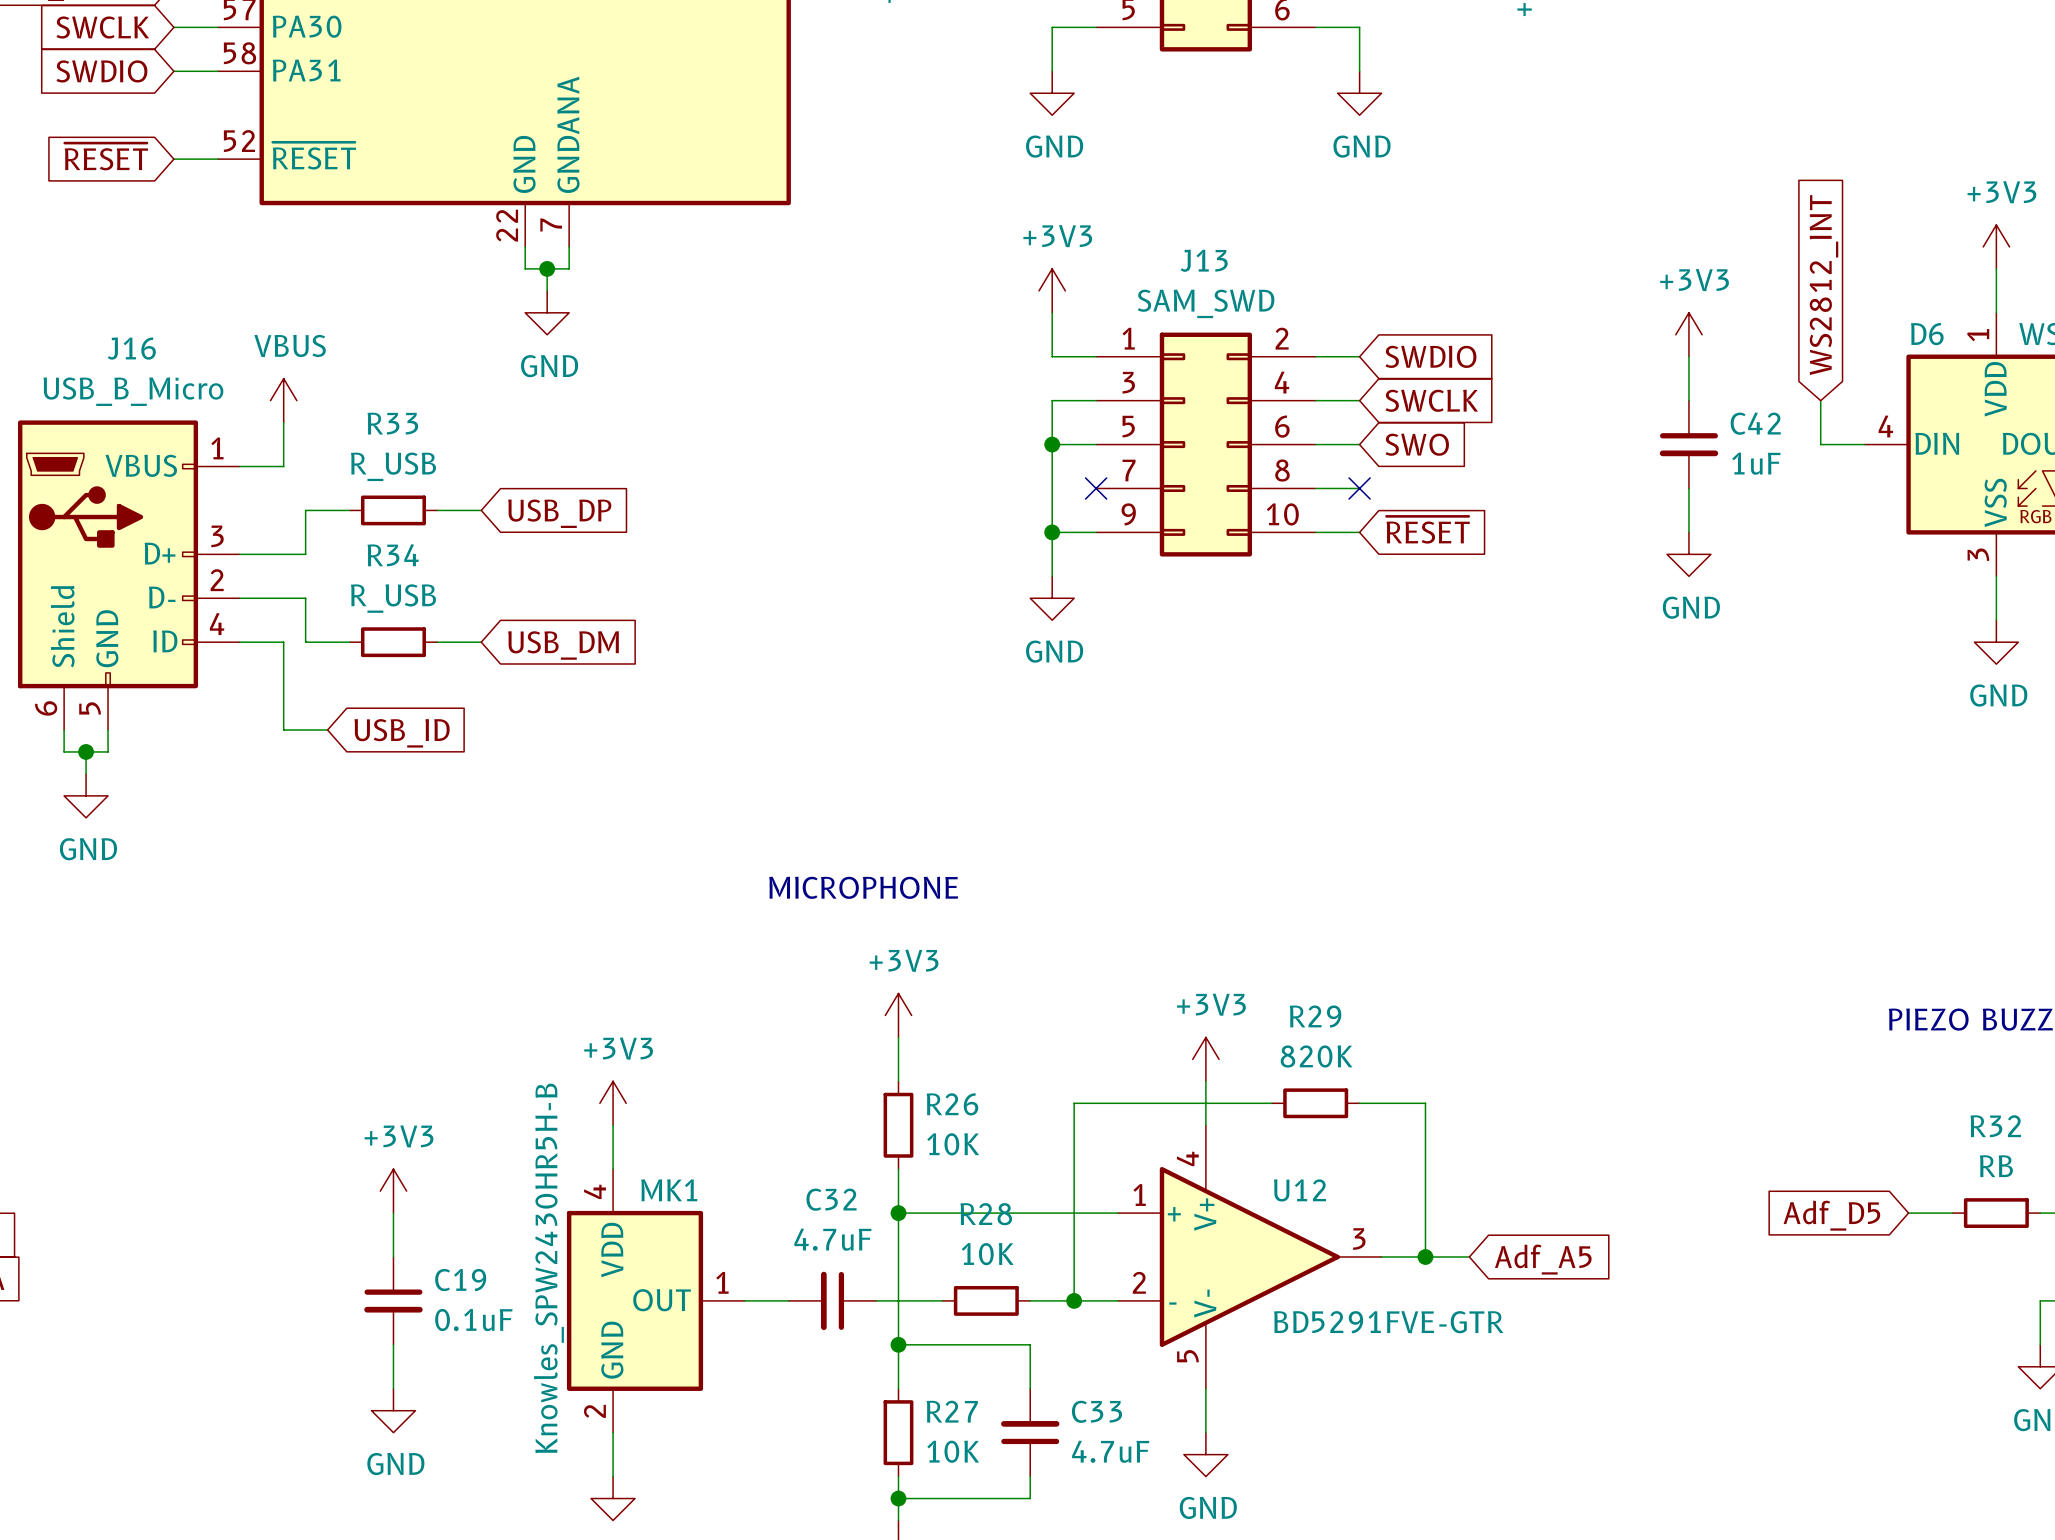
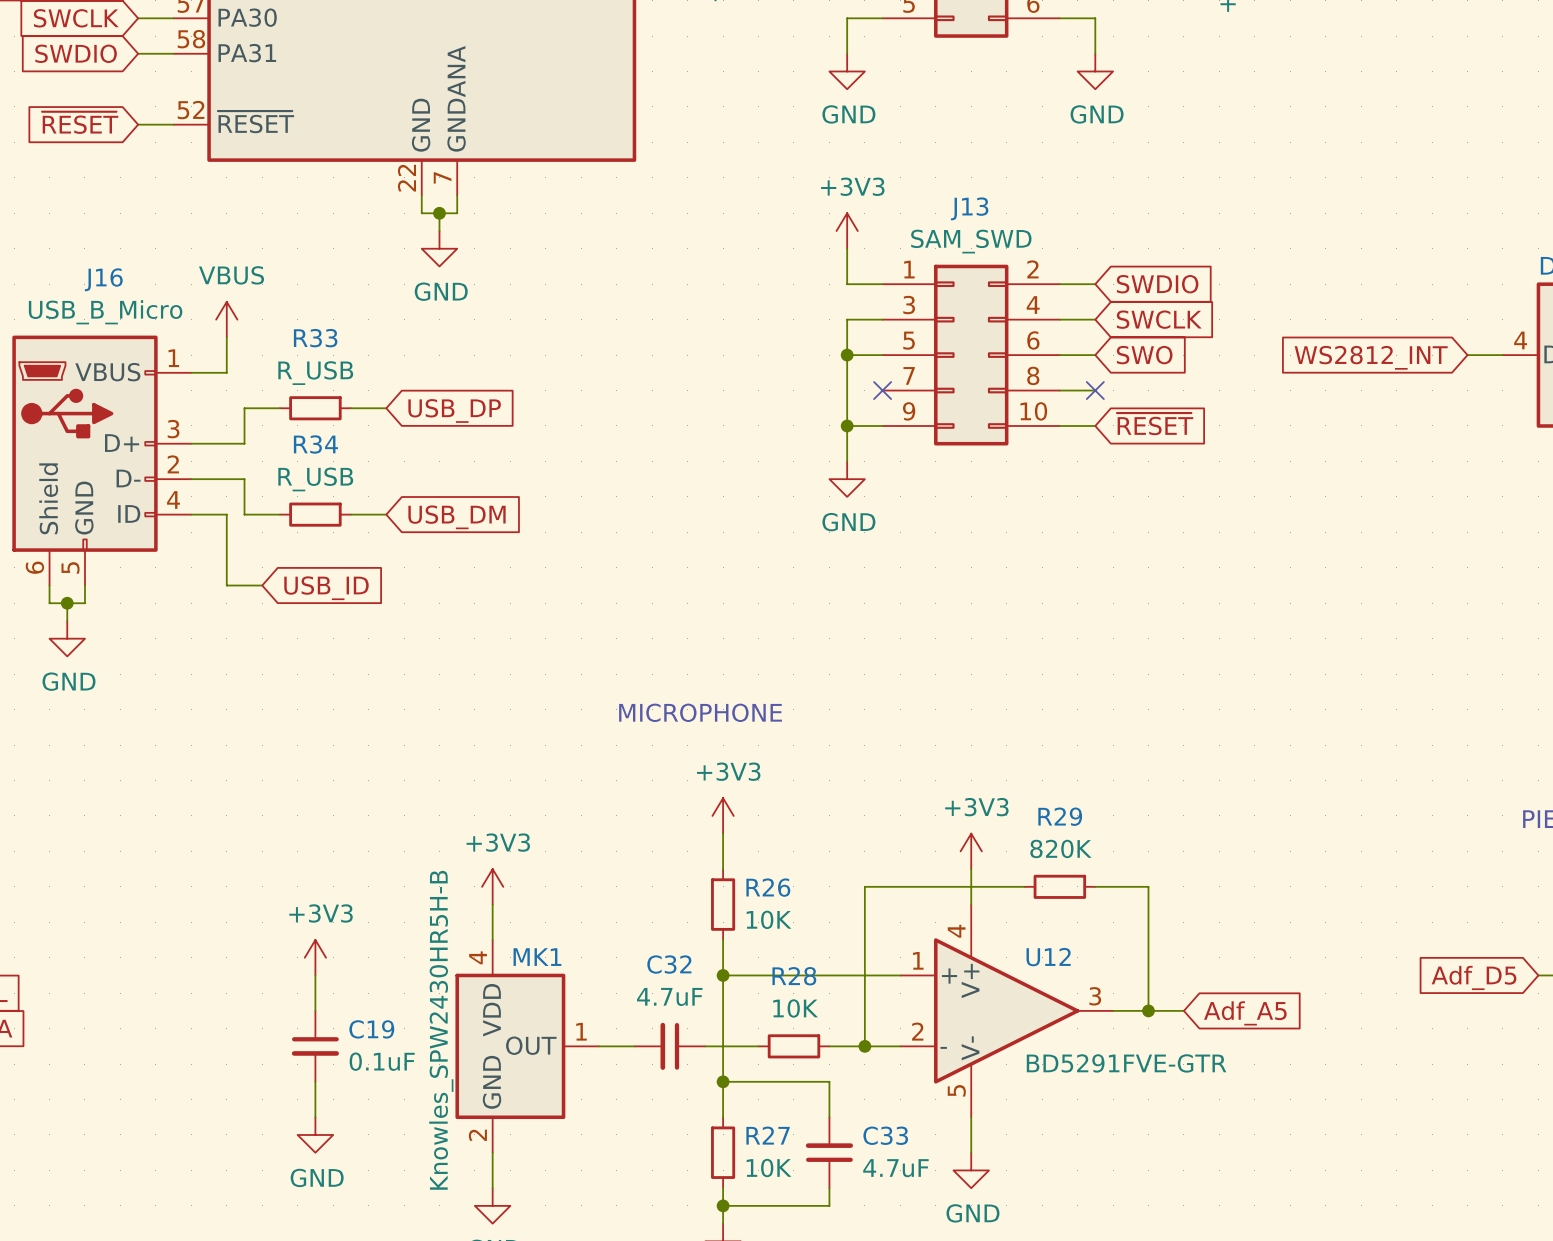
global label rotation: 0° (1824, 285) -> 90° counterclockwise (1371, 357)
power symbol: +3V3 (1688, 334) -> none
wire: (1688, 356) (1688, 400) -> none
wire: (1820, 400) (1820, 444) -> none
C42: 1uF (1688, 444) -> none
wire: (1688, 488) (1688, 532) -> none
power symbol: GND (1688, 554) -> none

